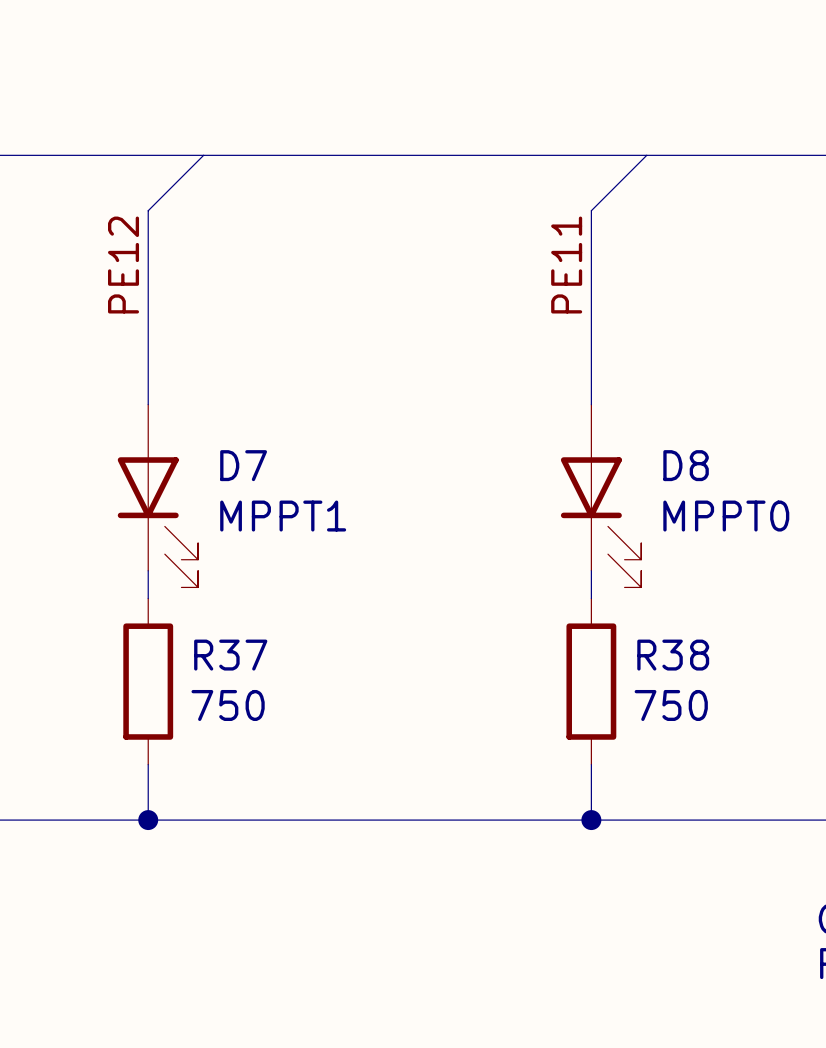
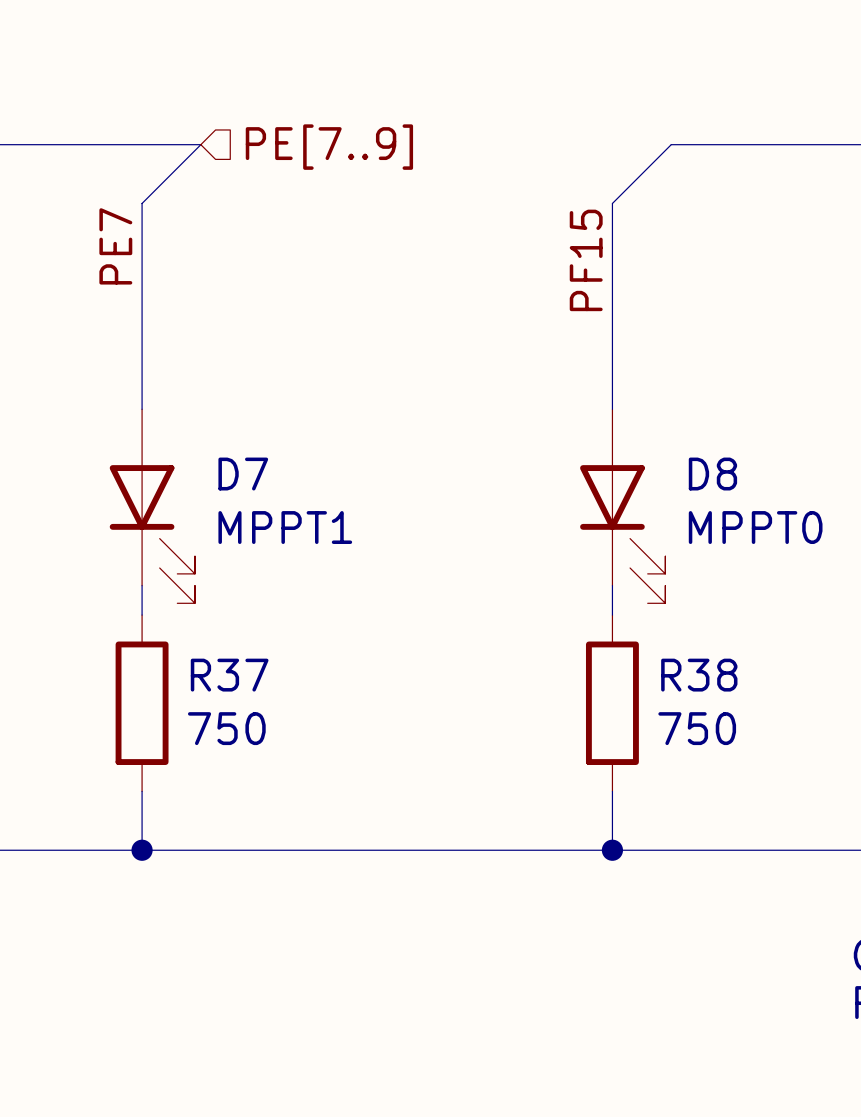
bus: (203, 155) (646, 155) -> none
hierarchical label: none -> PE[7..9] (329, 147)
label: PE12 (123, 265) -> PE7 (115, 246)
label: PE11 (566, 265) -> PF15 (586, 260)

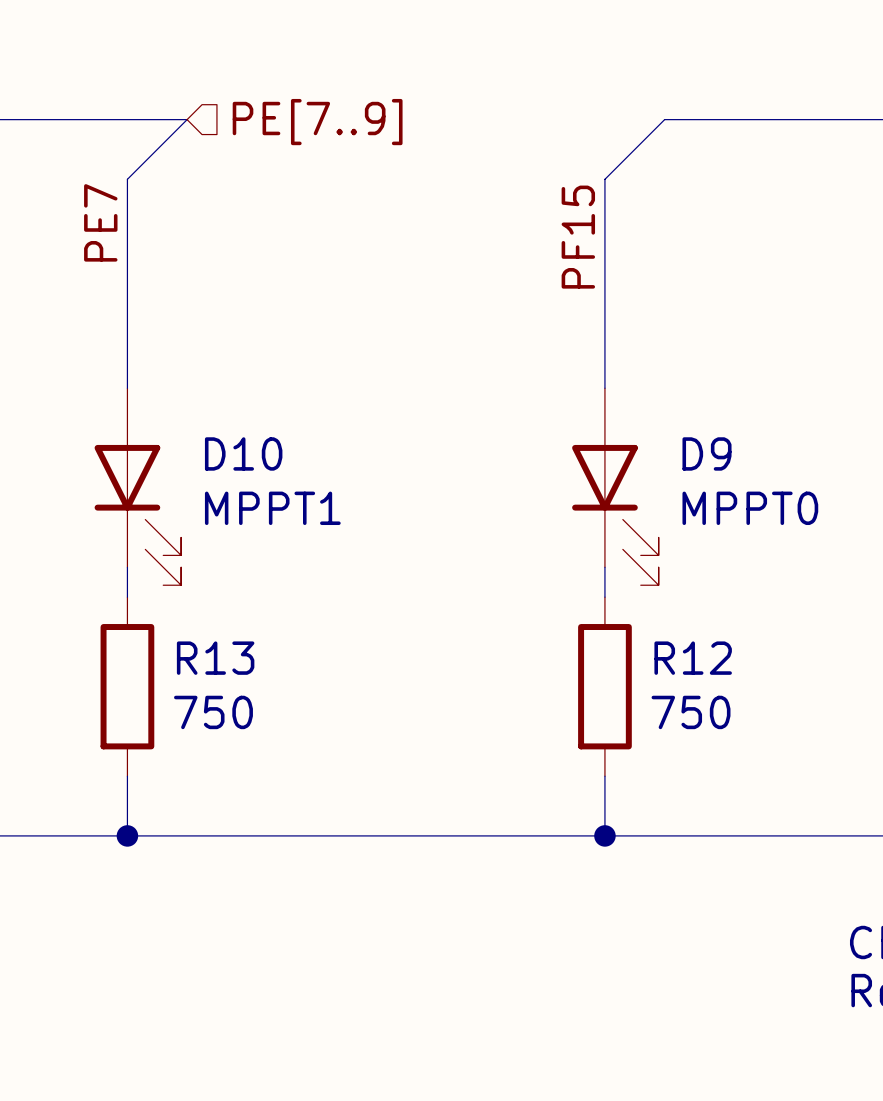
D7 name: D7 (243, 474) -> D10 (243, 453)
D8 name: D8 (712, 474) -> D9 (707, 453)
R37 name: R37 (229, 675) -> R13 (215, 658)
R38 name: R38 (699, 675) -> R12 (693, 658)

